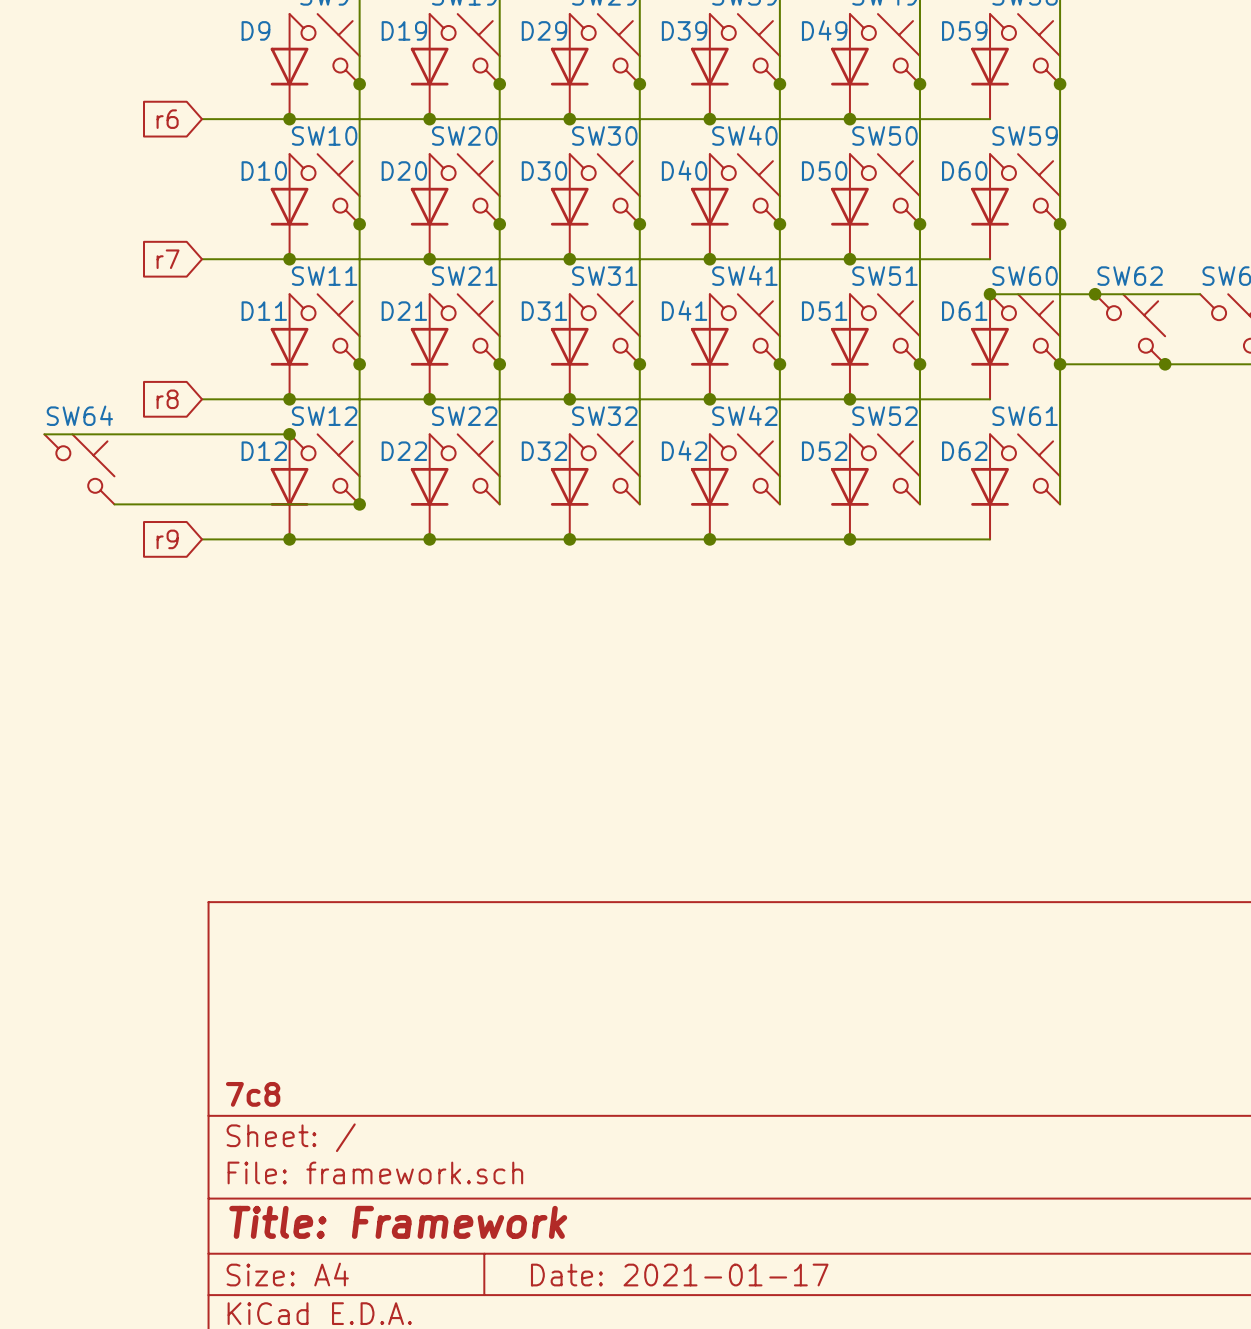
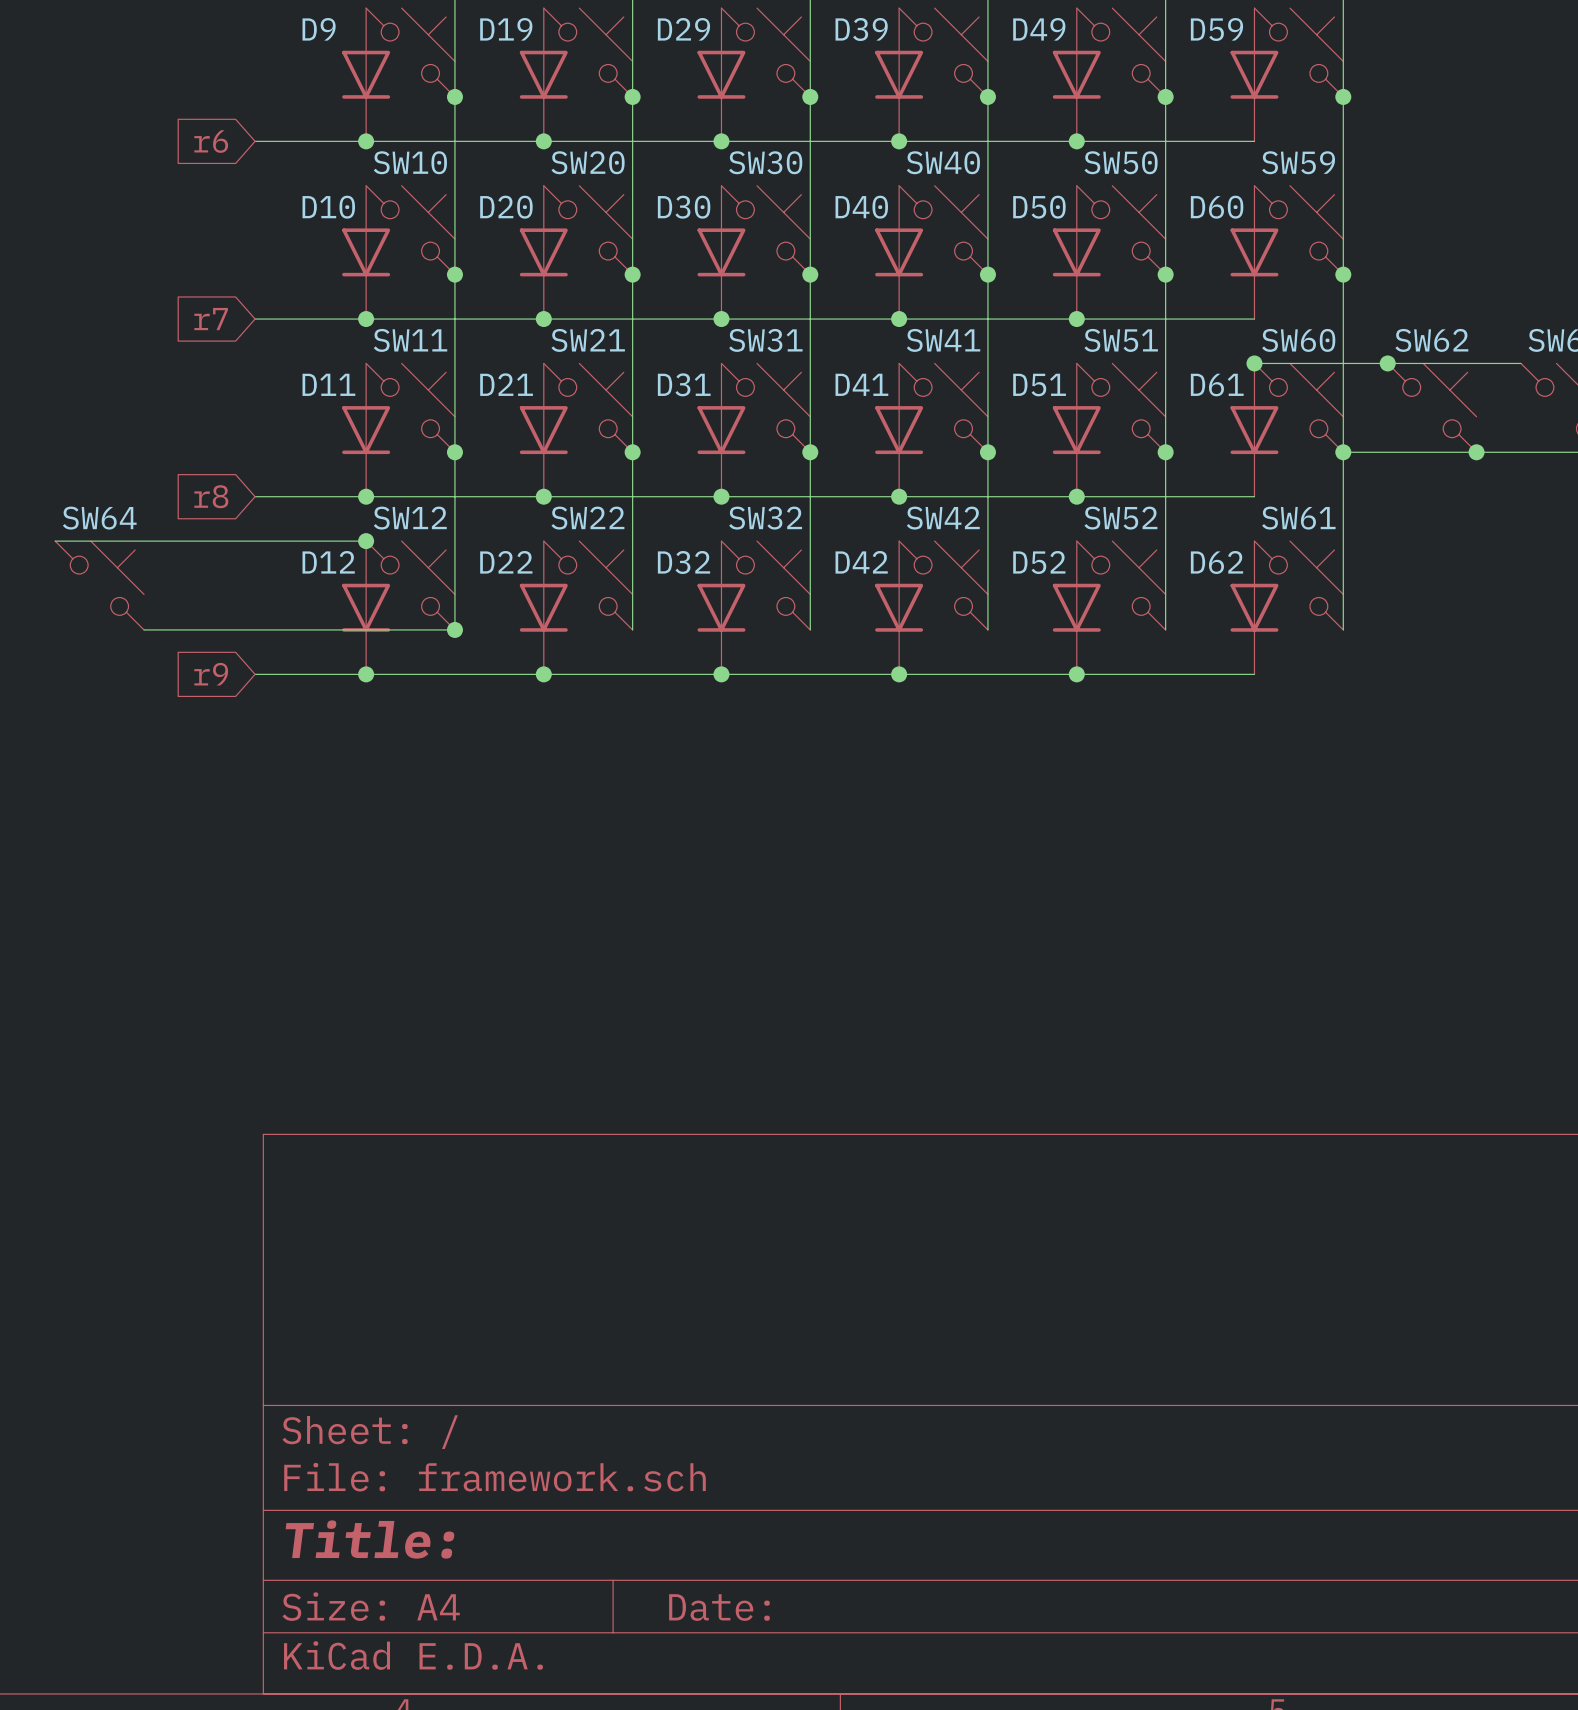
title block: 7c8 (253, 1094) -> none
title block: Title: Framework (398, 1222) -> Title: (370, 1539)
title block: Date: 2021-01-17 (679, 1275) -> Date: (719, 1607)

